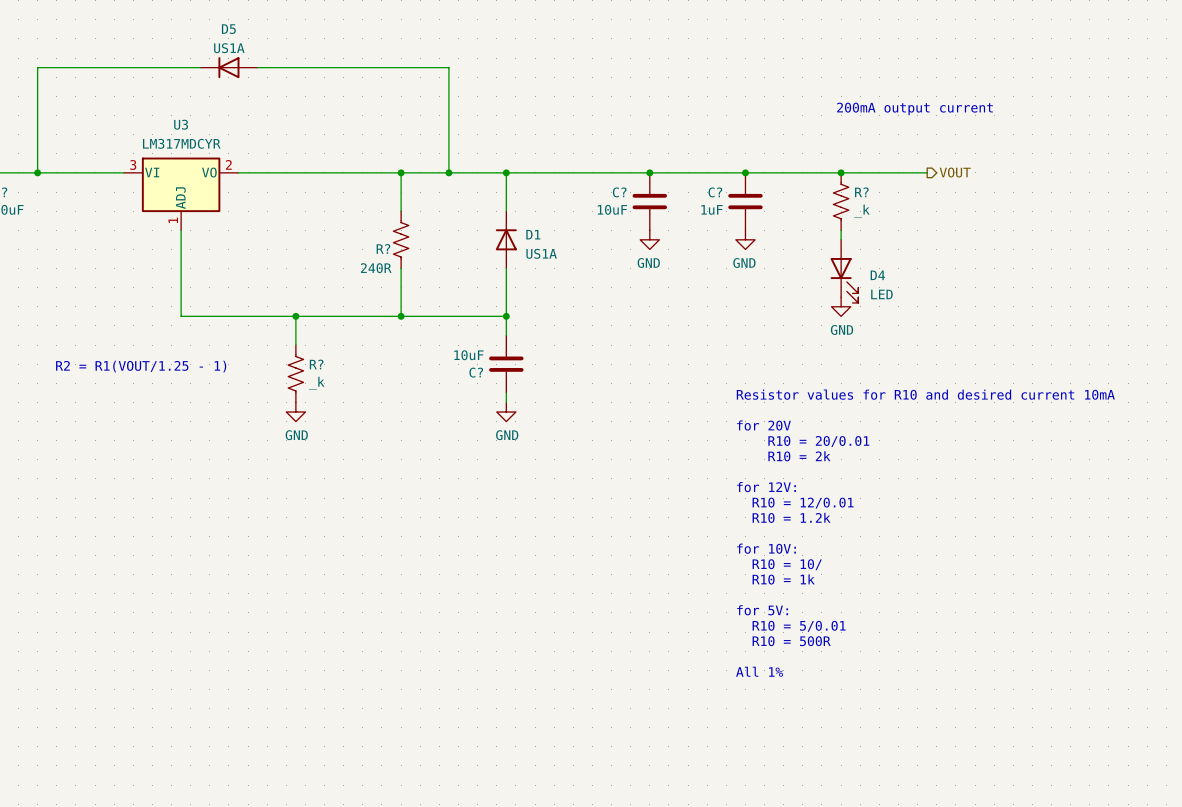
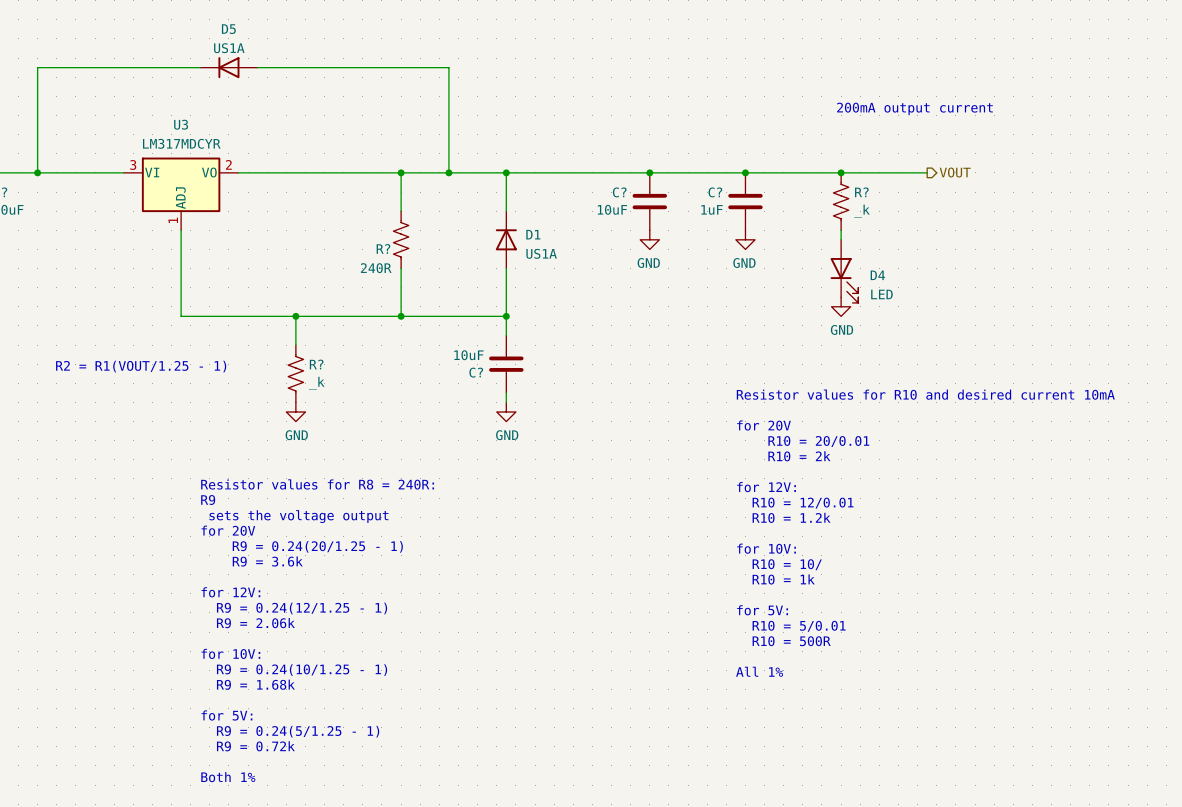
text: none -> Resistor values for R8 = 240R: (317, 484)
text: none -> R9 (208, 500)
text: none -> sets the voltage output (299, 516)
text: none -> for 20V (228, 530)
text: none -> R9 = 0.24(20/1.25 - 1) (317, 546)
text: none -> R9 = 3.6k (267, 561)
text: none -> for 12V: (230, 592)
text: none -> R9 = 0.24(12/1.25 - 1) (302, 608)
text: none -> R9 = 2.06k (255, 623)
text: none -> for 10V: (230, 653)
text: none -> R9 = 0.24(10/1.25 - 1) (302, 670)
text: none -> R9 = 1.68k (255, 684)
text: none -> for 5V: (226, 715)
text: none -> R9 = 0.24(5/1.25 - 1) (298, 731)
text: none -> R9 = 0.72k (255, 746)
text: none -> Both 1% (228, 777)

